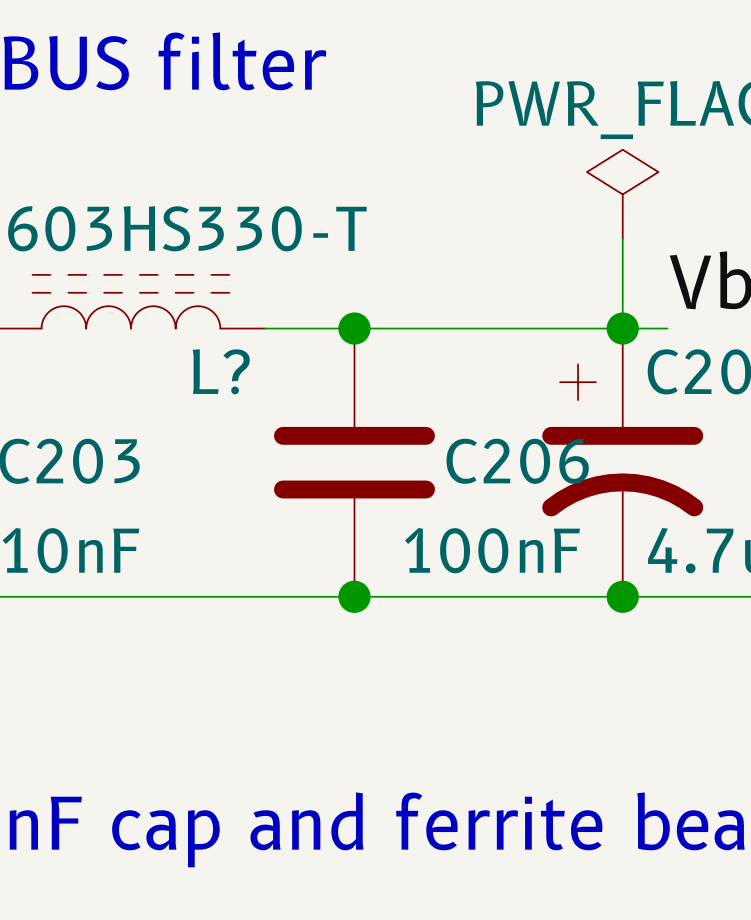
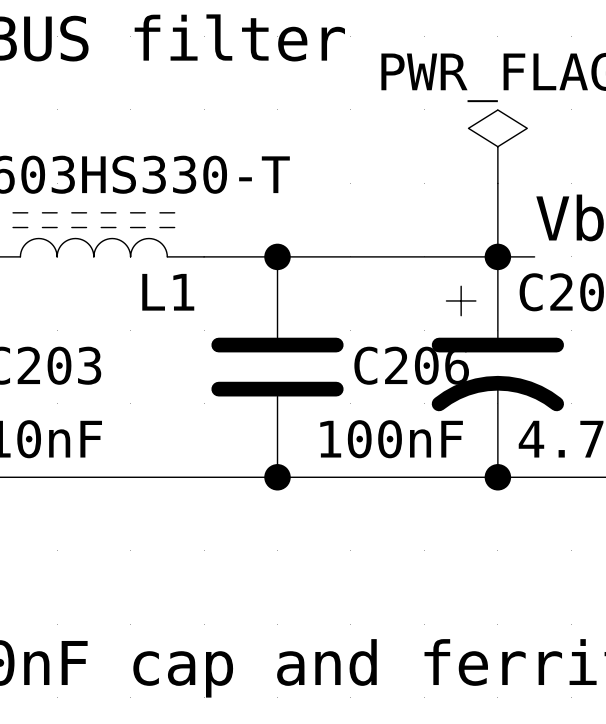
L? name: L? (221, 371) -> L1 (168, 292)

